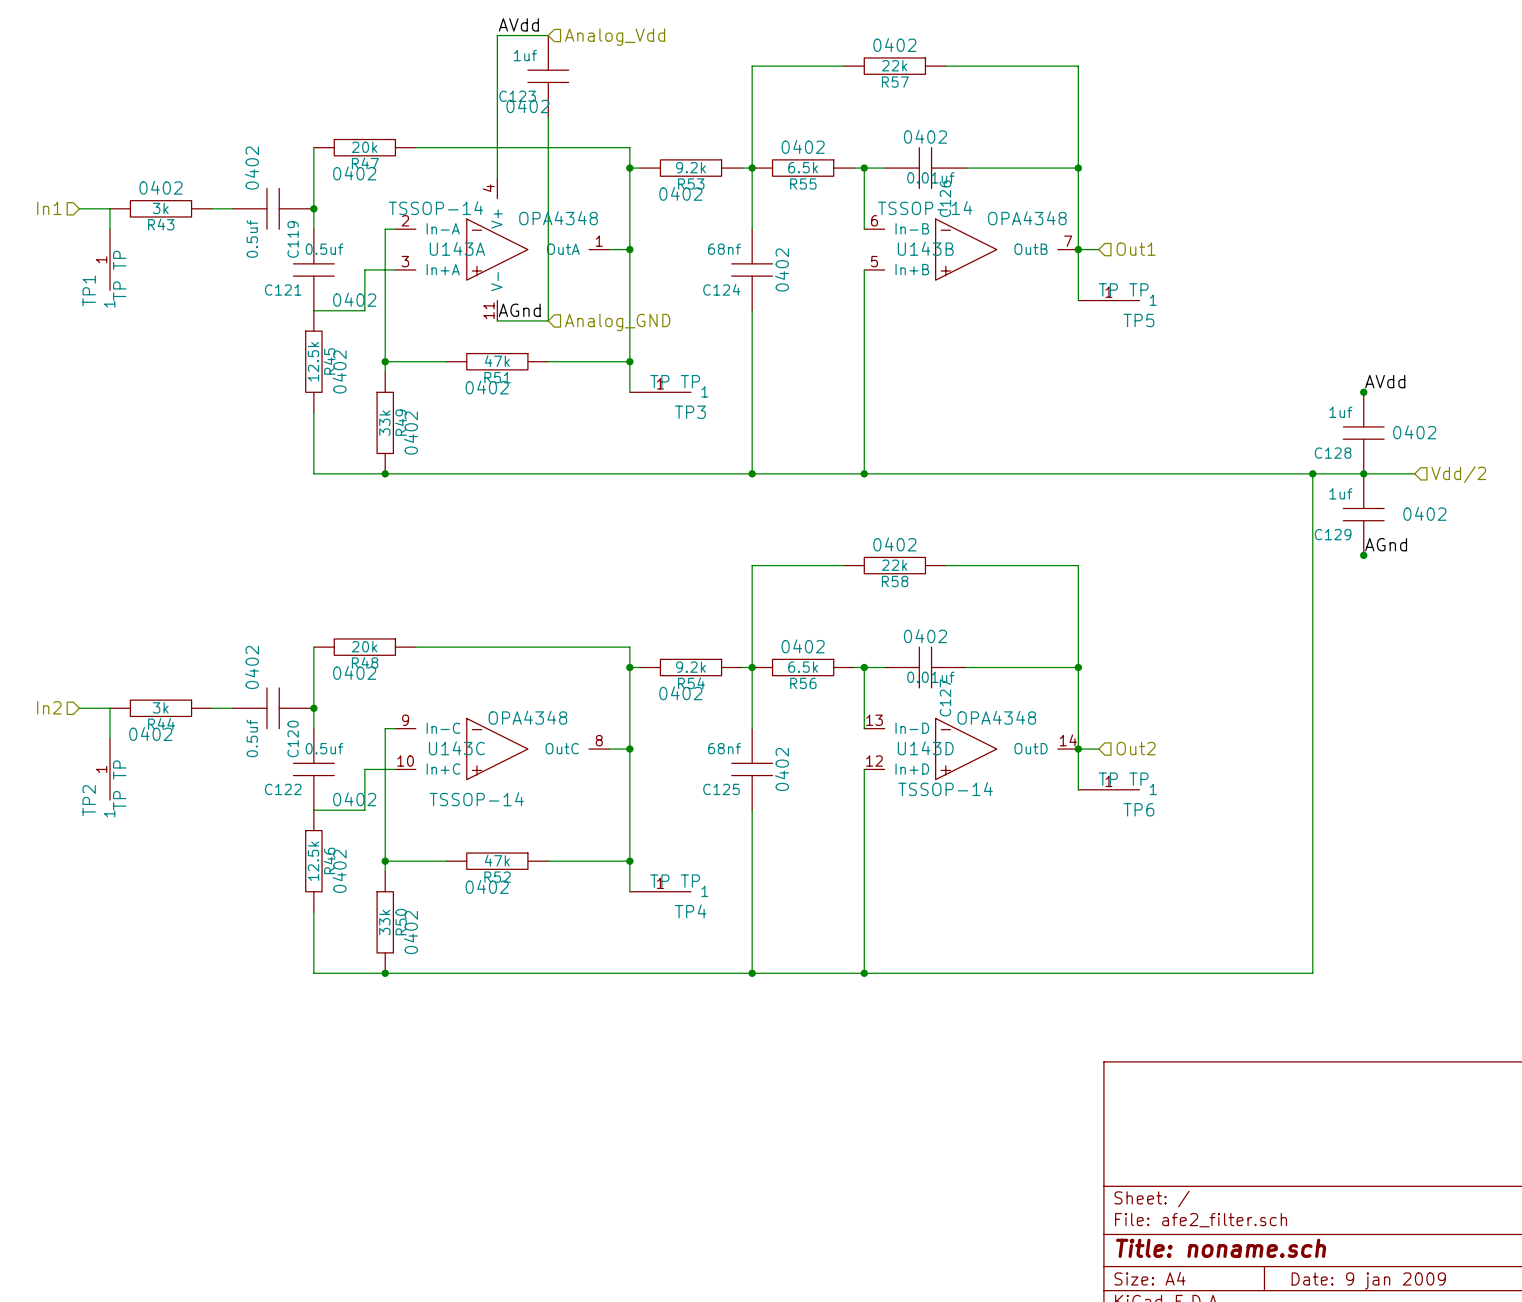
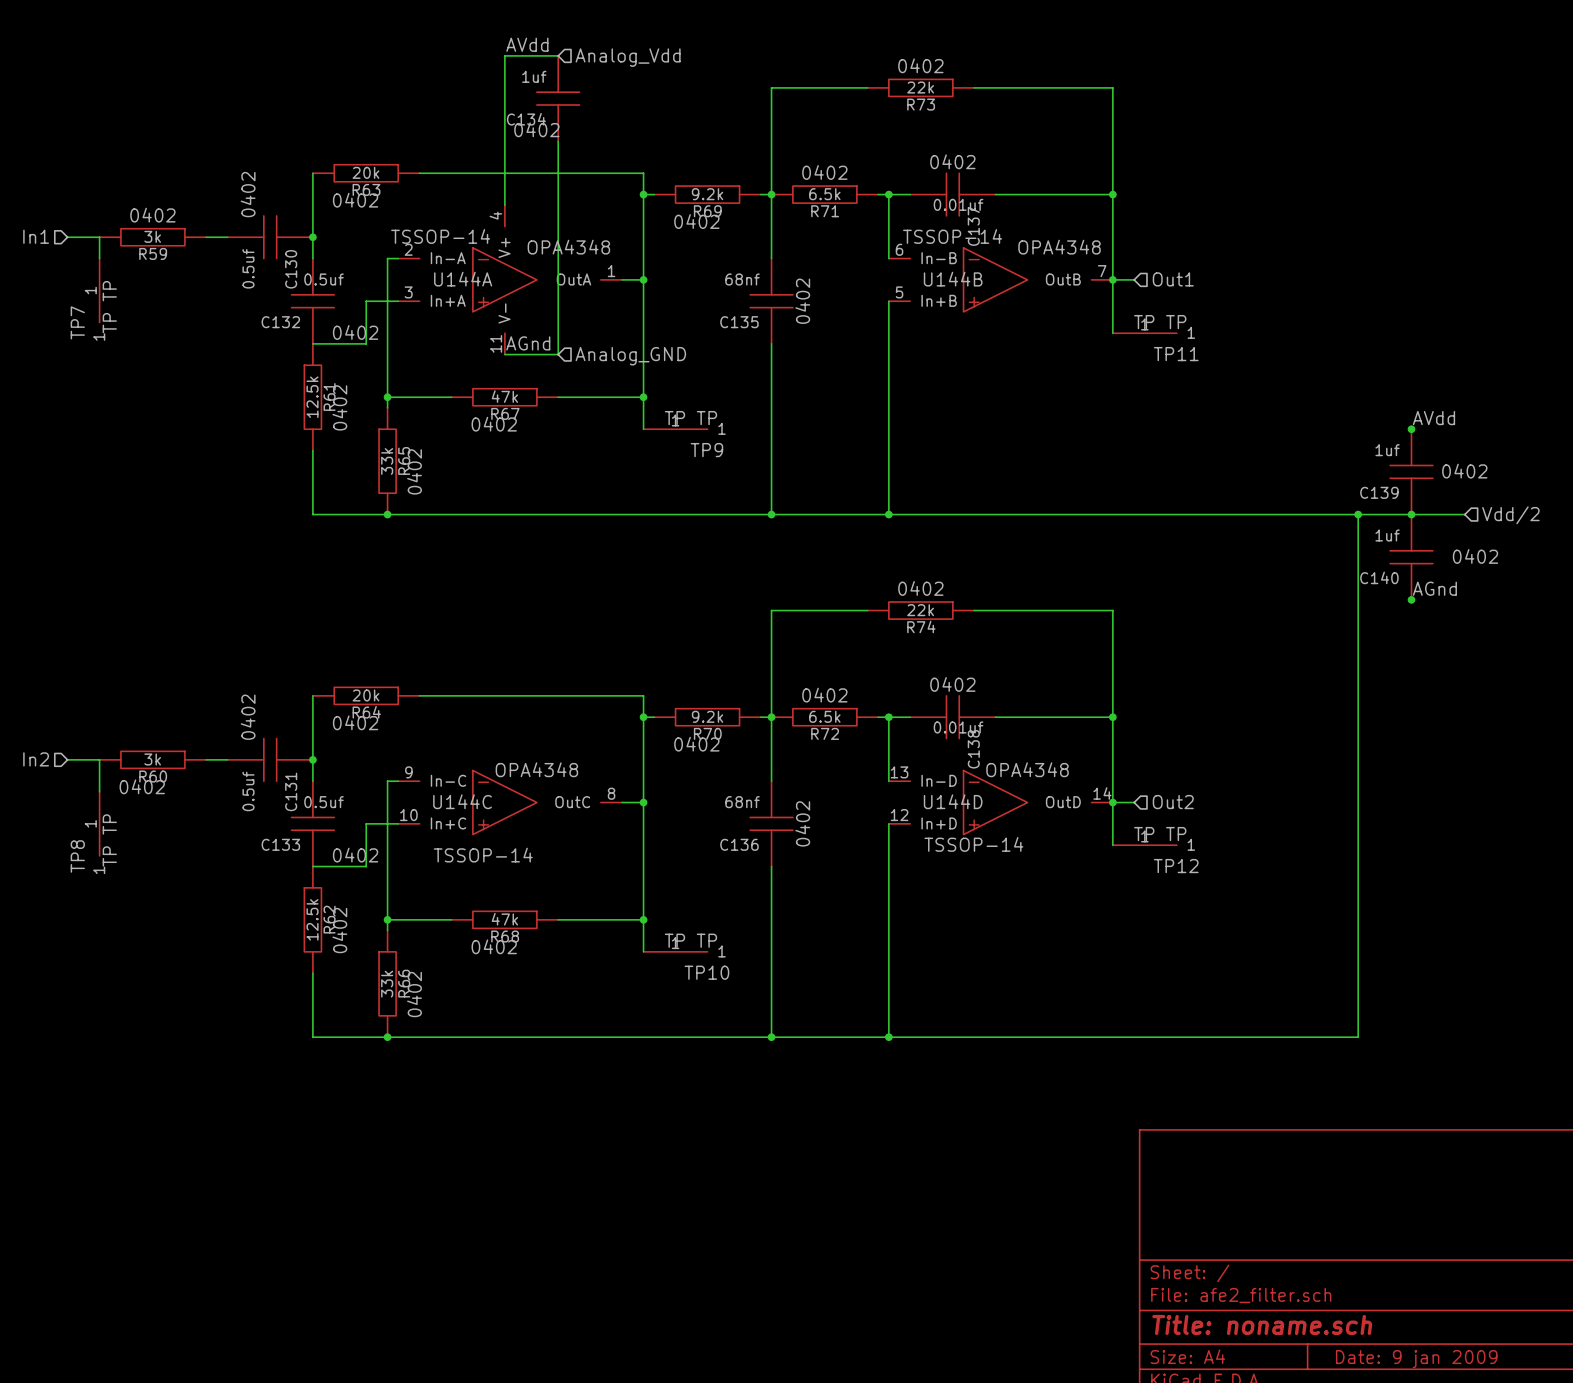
R57 name: R57 (895, 82) -> R73 (921, 104)
C123 name: C123 (517, 96) -> C134 (526, 119)
R47 name: R47 (365, 163) -> R63 (366, 189)
R53 name: R53 (691, 183) -> R69 (707, 211)
R55 name: R55 (803, 183) -> R71 (825, 211)
C126 name: C126 (945, 198) -> C137 (973, 226)
R43 name: R43 (161, 224) -> R59 (153, 253)
C119 name: C119 (293, 239) -> C130 (291, 269)
U143A name: U143A (457, 248) -> U144A (463, 279)
U143B name: U143B (925, 248) -> U144B (953, 279)
C121 name: C121 (283, 289) -> C132 (280, 322)
C124 name: C124 (721, 289) -> C135 (739, 322)
TP1 name: TP1 (89, 290) -> TP7 (77, 322)
TP5 name: TP5 (1138, 320) -> TP11 (1176, 354)
R45 name: R45 (329, 361) -> R61 (329, 396)
R51 name: R51 (497, 377) -> R67 (505, 413)
TP3 name: TP3 (690, 412) -> TP9 (706, 450)
R49 name: R49 (400, 422) -> R65 (404, 460)
C128 name: C128 (1333, 453) -> C139 (1379, 492)
C129 name: C129 (1333, 534) -> C140 (1379, 577)
R58 name: R58 (895, 581) -> R74 (921, 626)
R48 name: R48 (365, 662) -> R64 (366, 712)
R54 name: R54 (691, 683) -> R70 (707, 733)
R56 name: R56 (803, 683) -> R72 (825, 733)
C127 name: C127 (945, 697) -> C138 (973, 749)
R44 name: R44 (161, 723) -> R60 (153, 776)
C120 name: C120 (293, 738) -> C131 (291, 791)
U143C name: U143C (456, 748) -> U144C (462, 801)
U143D name: U143D (925, 748) -> U144D (953, 801)
C122 name: C122 (283, 789) -> C133 (280, 844)
C125 name: C125 (721, 789) -> C136 (739, 844)
TP2 name: TP2 (89, 800) -> TP8 (77, 856)
TP6 name: TP6 (1138, 809) -> TP12 (1176, 866)
R46 name: R46 (329, 860) -> R62 (329, 919)
R52 name: R52 (497, 877) -> R68 (505, 936)
TP4 name: TP4 (690, 911) -> TP10 (706, 972)
R50 name: R50 (401, 922) -> R66 (404, 983)

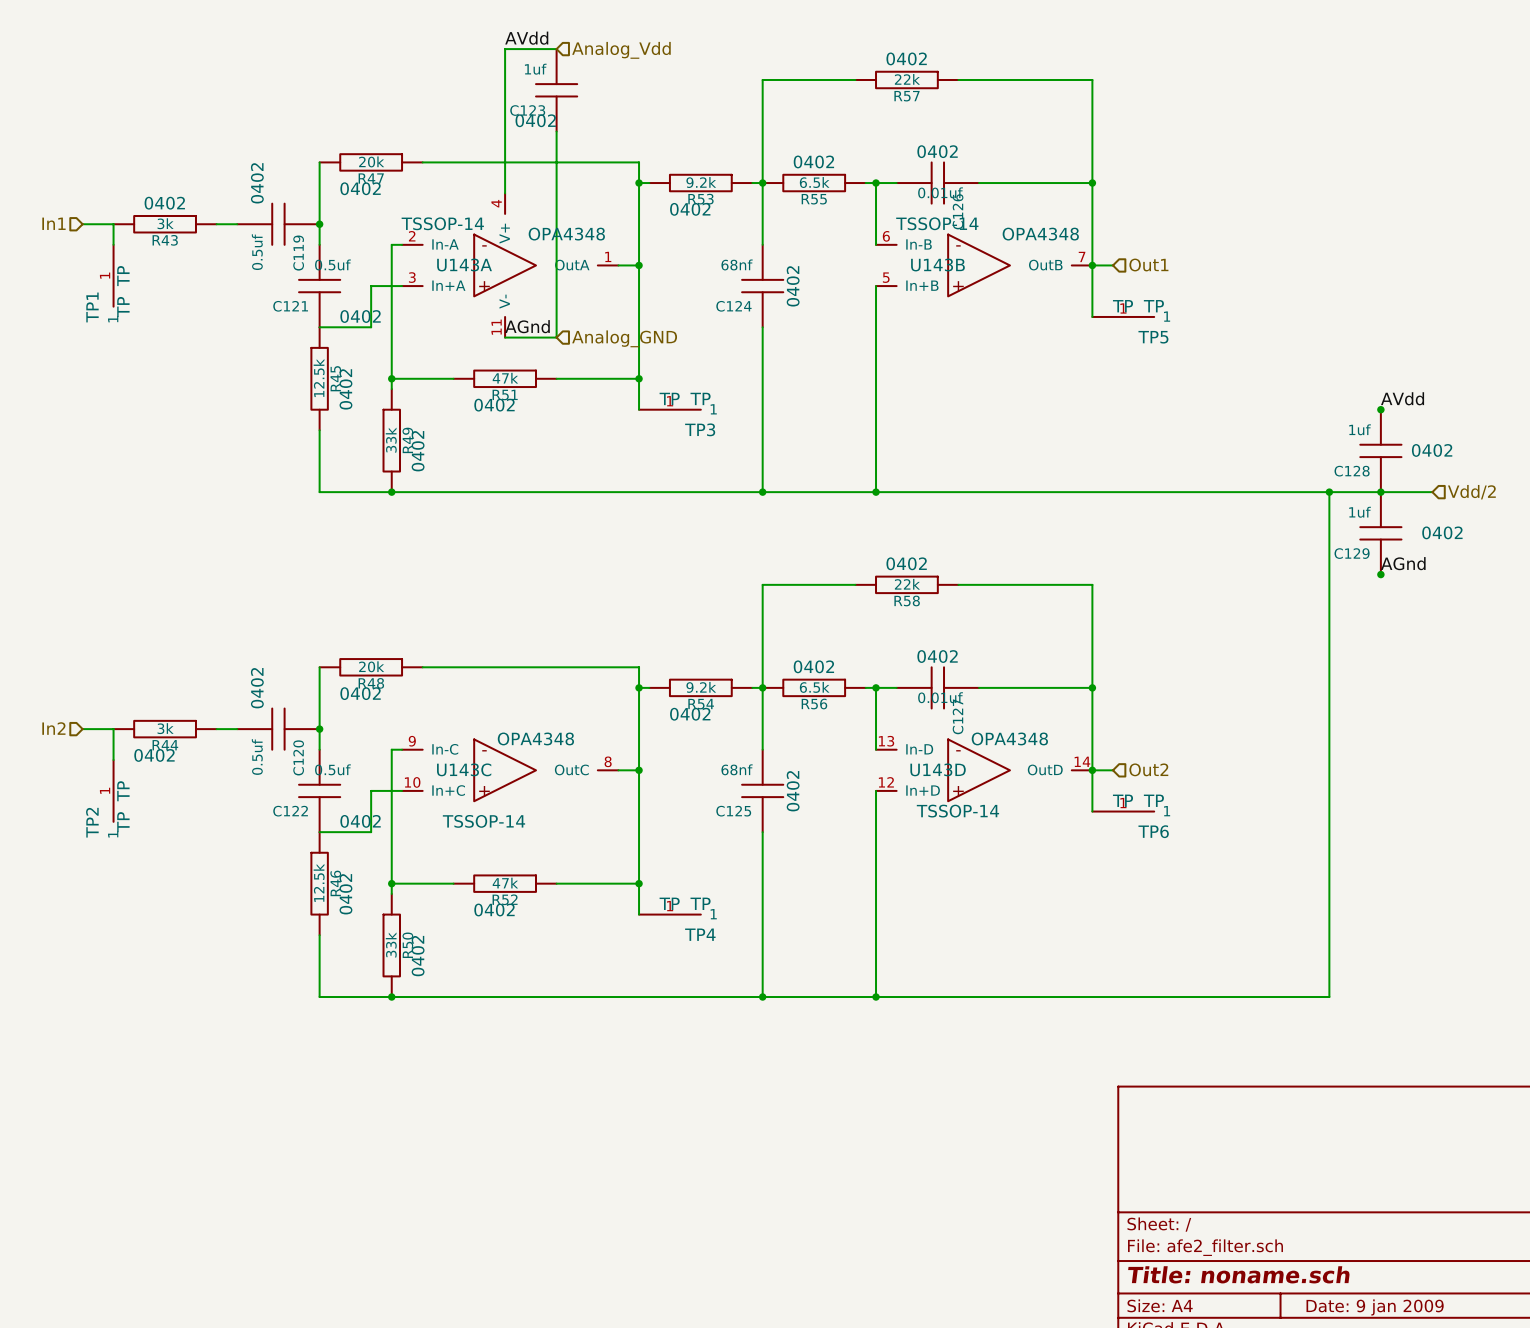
R73 name: R73 (921, 104) -> R57 (907, 96)
C134 name: C134 (526, 119) -> C123 (527, 110)
R63 name: R63 (366, 189) -> R47 (371, 178)
R69 name: R69 (707, 211) -> R53 (700, 199)
R71 name: R71 (825, 211) -> R55 (814, 199)
C137 name: C137 (973, 226) -> C126 (958, 211)
R59 name: R59 (153, 253) -> R43 (165, 240)
C130 name: C130 (291, 269) -> C119 (298, 253)
U144A name: U144A (463, 279) -> U143A (464, 265)
U144B name: U144B (953, 279) -> U143B (937, 265)
TP7 name: TP7 (77, 322) -> TP1 (92, 307)
C132 name: C132 (280, 322) -> C121 (290, 306)
C135 name: C135 (739, 322) -> C124 (733, 306)
TP11 name: TP11 (1176, 354) -> TP5 (1153, 337)
R61 name: R61 (329, 396) -> R45 (335, 378)
R67 name: R67 (505, 413) -> R51 (505, 394)
TP9 name: TP9 (706, 450) -> TP3 (700, 429)
R65 name: R65 (404, 460) -> R49 (407, 440)
C139 name: C139 (1379, 492) -> C128 (1352, 471)
C140 name: C140 (1379, 577) -> C129 (1352, 553)
R74 name: R74 (921, 626) -> R58 (907, 600)
R64 name: R64 (366, 712) -> R48 (371, 683)
R70 name: R70 (707, 733) -> R54 (701, 704)
R72 name: R72 (825, 733) -> R56 (814, 704)
C138 name: C138 (973, 749) -> C127 (958, 716)
R60 name: R60 (153, 776) -> R44 (165, 745)
C131 name: C131 (291, 791) -> C120 (298, 757)
U144C name: U144C (462, 801) -> U143C (464, 769)
U144D name: U144D (953, 801) -> U143D (938, 769)
C133 name: C133 (280, 844) -> C122 (290, 811)
C136 name: C136 (739, 844) -> C125 (733, 811)
TP8 name: TP8 (77, 856) -> TP2 (92, 822)
TP12 name: TP12 (1176, 866) -> TP6 (1153, 831)
R62 name: R62 (329, 919) -> R46 (335, 883)
R68 name: R68 (505, 936) -> R52 (505, 899)
TP10 name: TP10 (706, 972) -> TP4 (700, 934)
R66 name: R66 (404, 983) -> R50 (407, 945)

